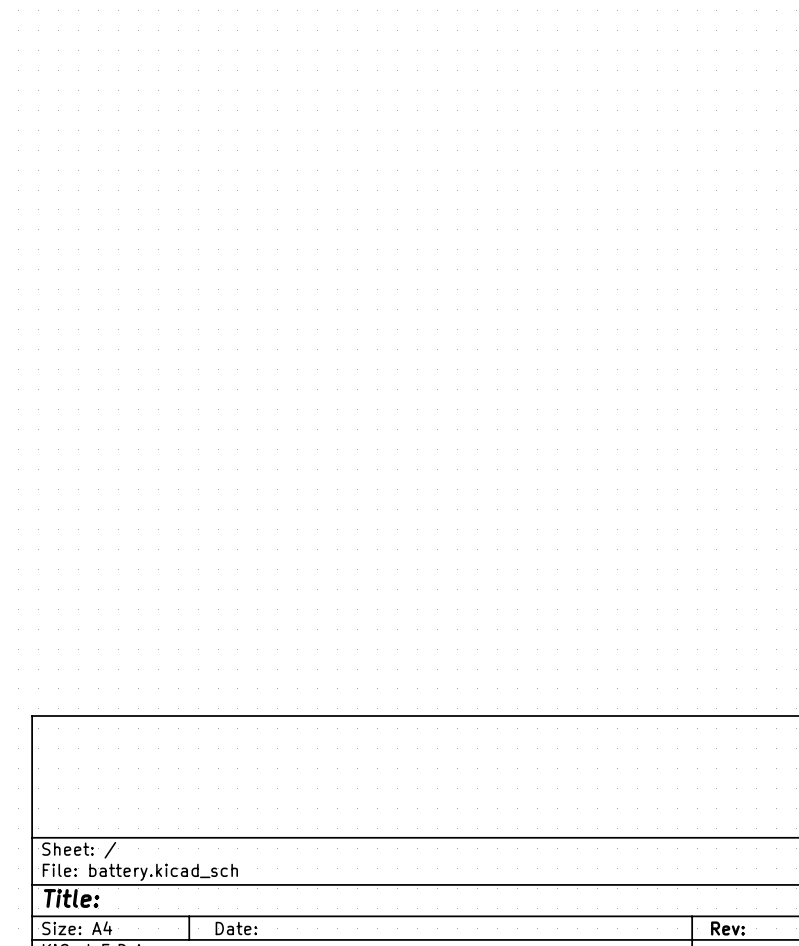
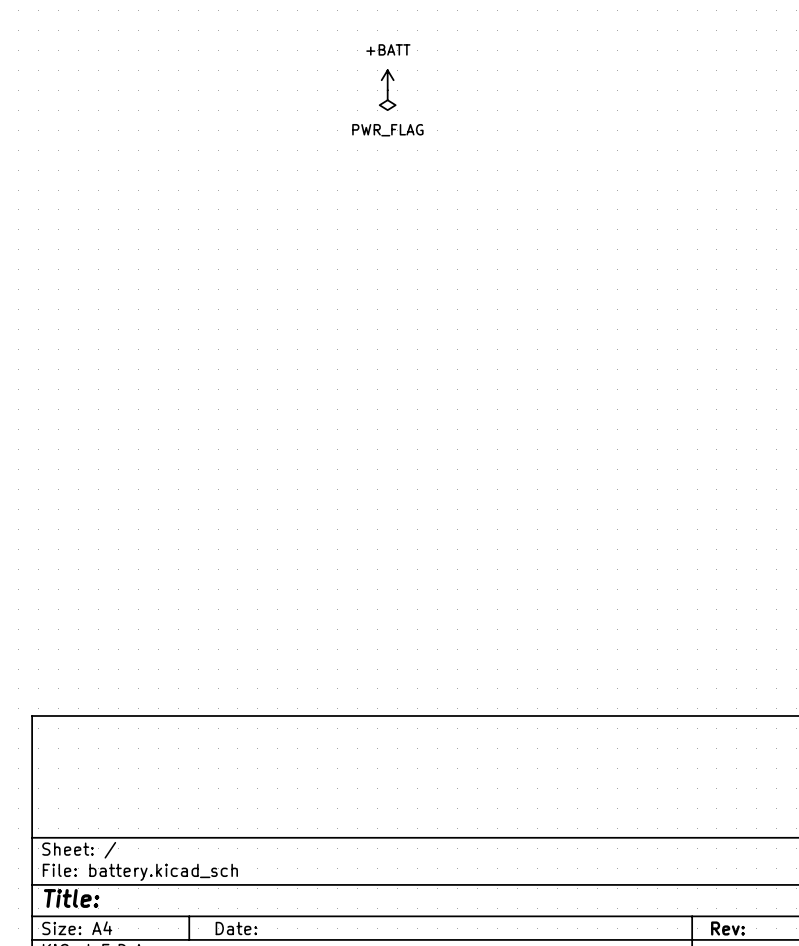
power symbol: none -> +BATT (387, 80)
power symbol: none -> PWR_FLAG (387, 100)

